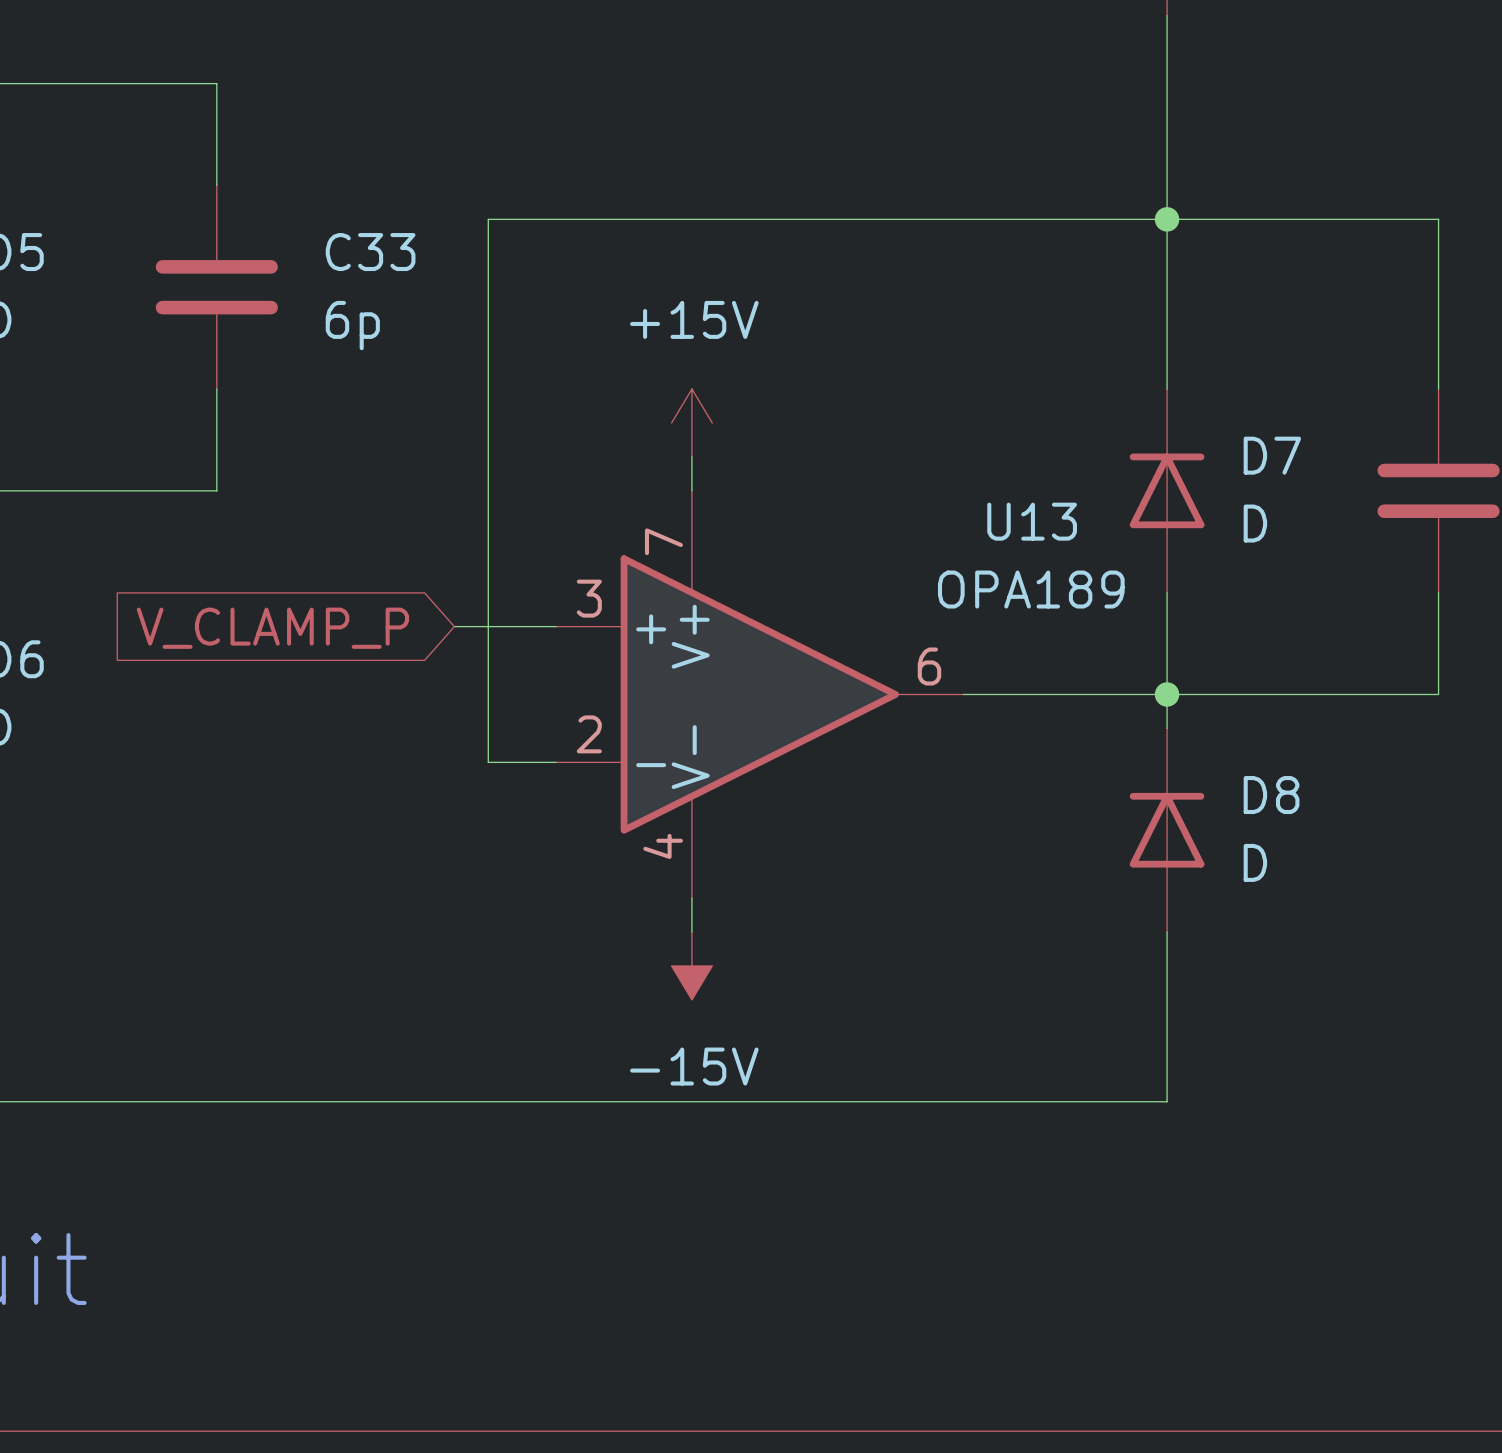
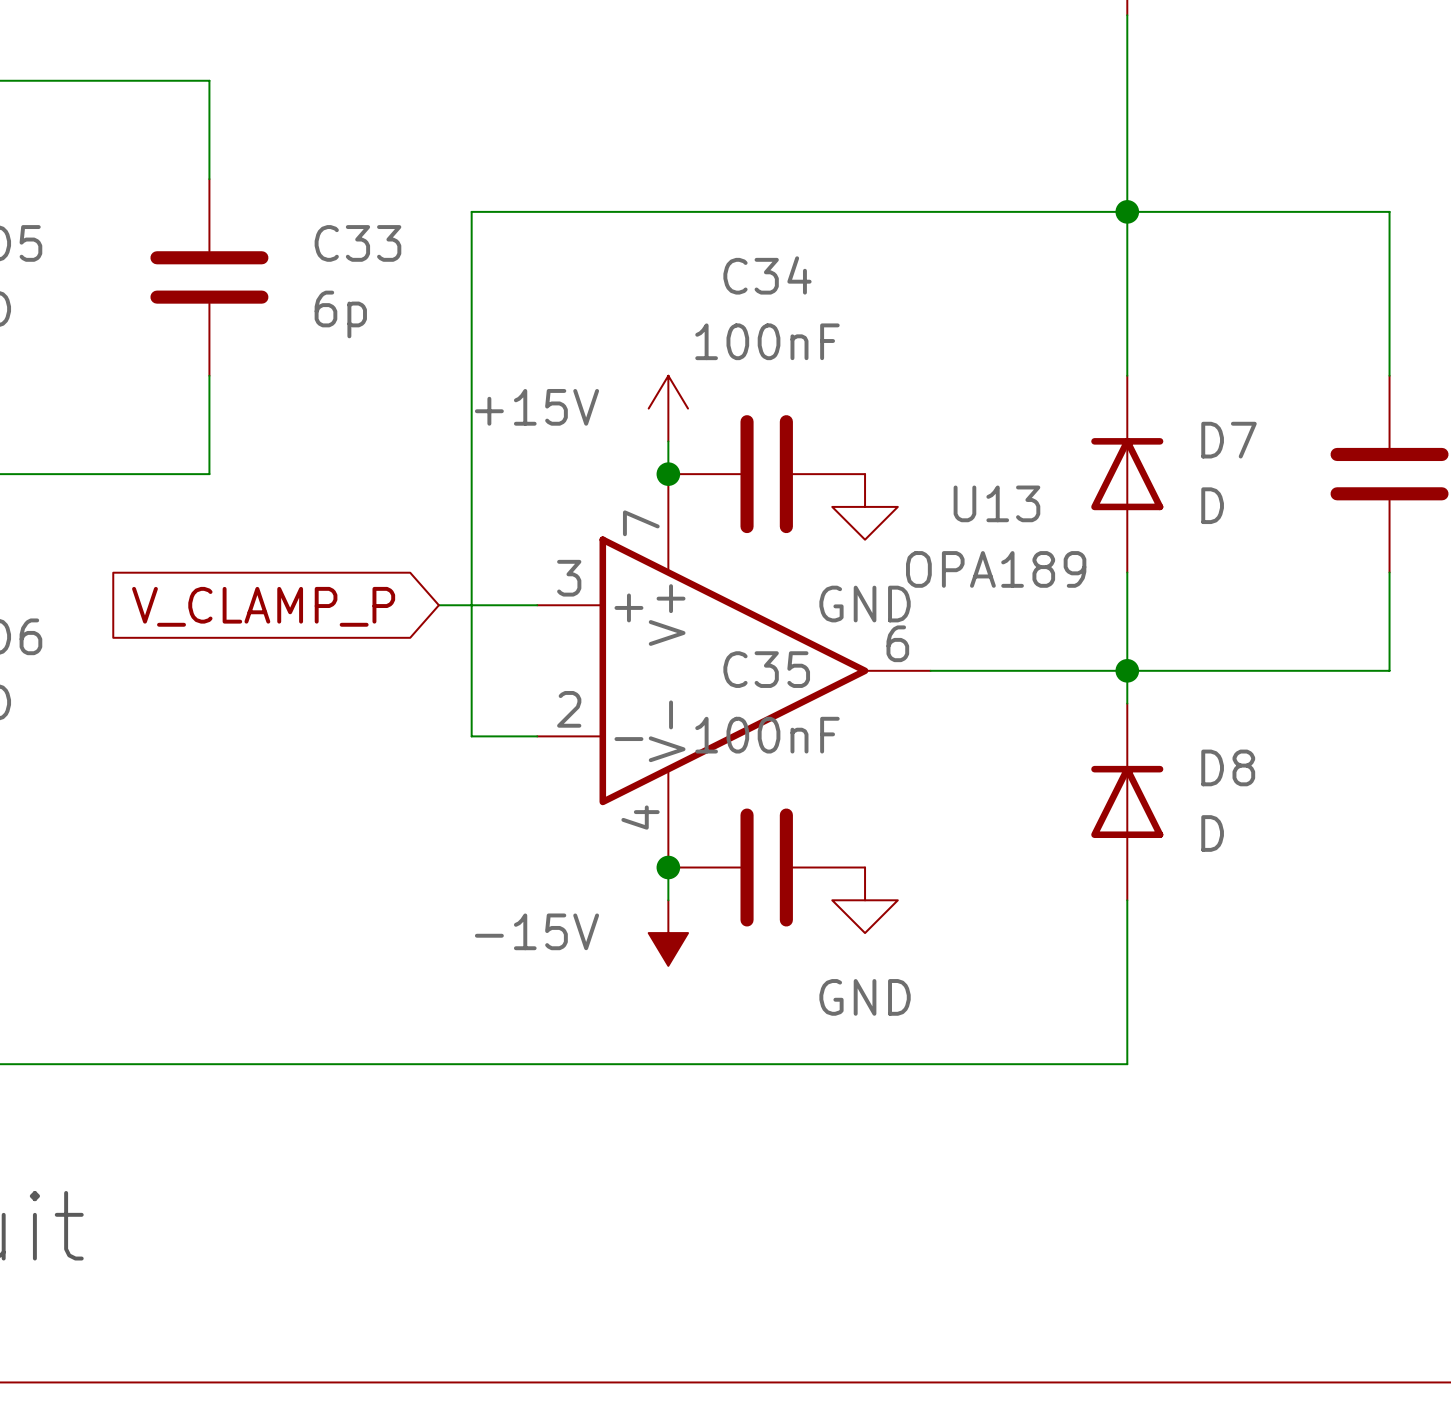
power symbol text position: +15V (694, 319) -> +15V (536, 407)
junction: none -> (668, 474)
C34: none -> 100nF (766, 474)
power symbol: none -> GND (865, 506)
junction: none -> (668, 867)
C35: none -> 100nF (766, 867)
power symbol: none -> GND (865, 900)
power symbol text position: -15V (694, 1066) -> -15V (536, 931)

